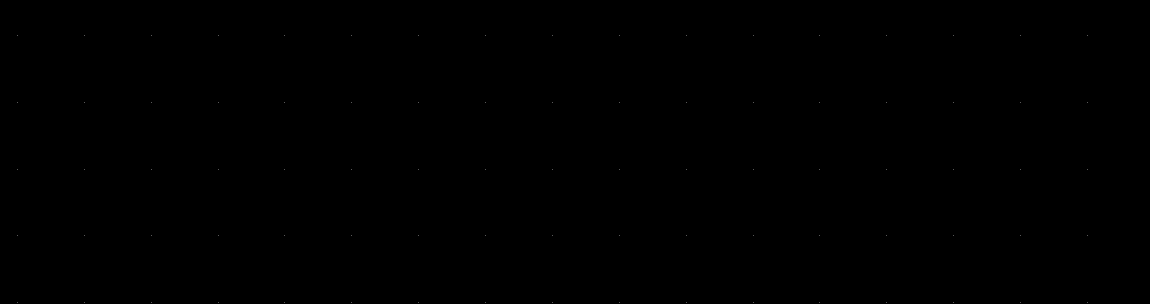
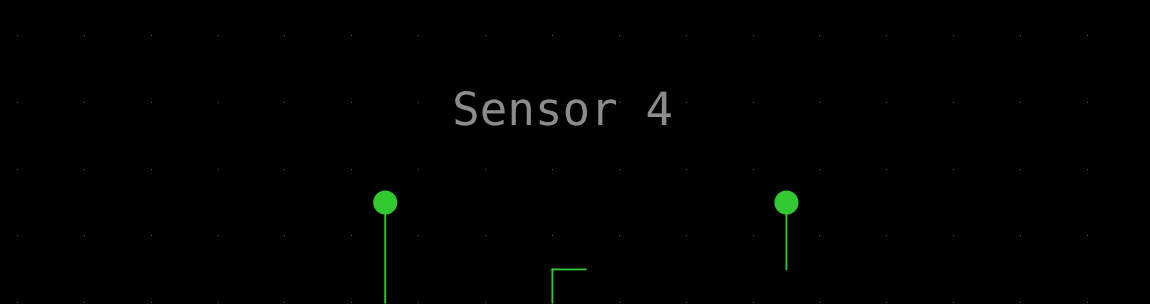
text: none -> Sensor 4 (562, 108)
wire: none -> (385, 202) (385, 302)
junction: none -> (385, 202)
wire: none -> (786, 202) (786, 269)
junction: none -> (786, 202)
wire: none -> (585, 269) (552, 269) (552, 302)

